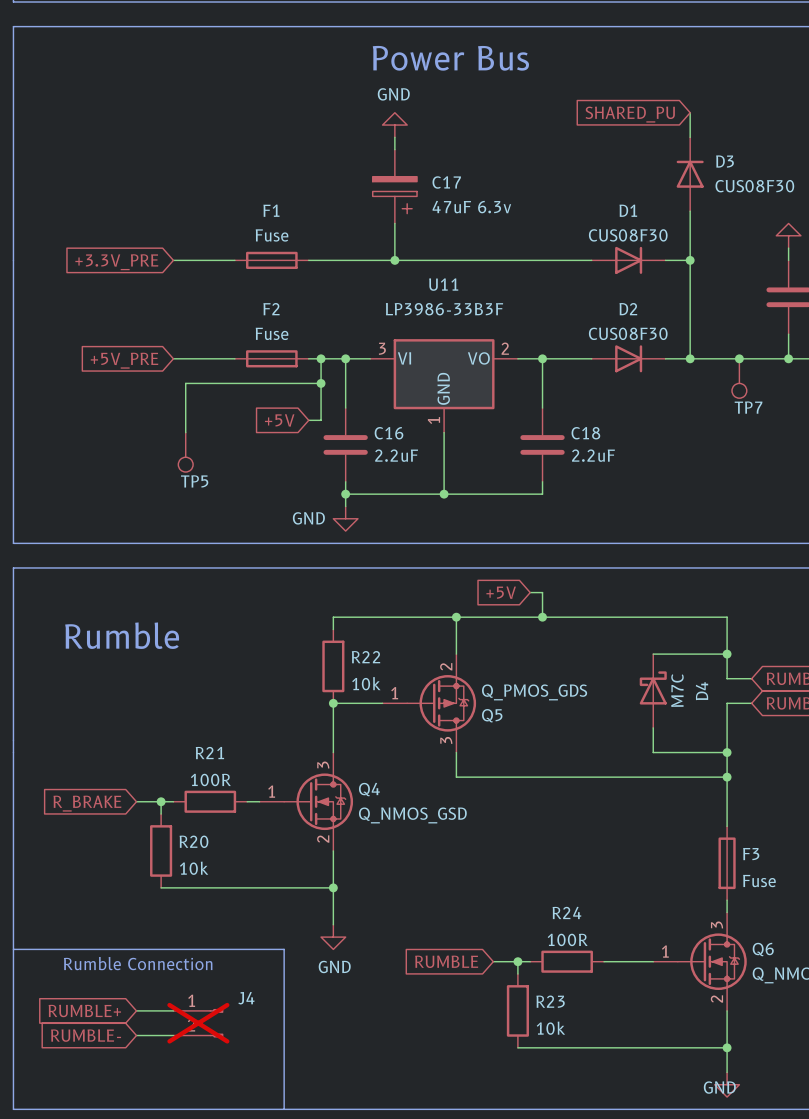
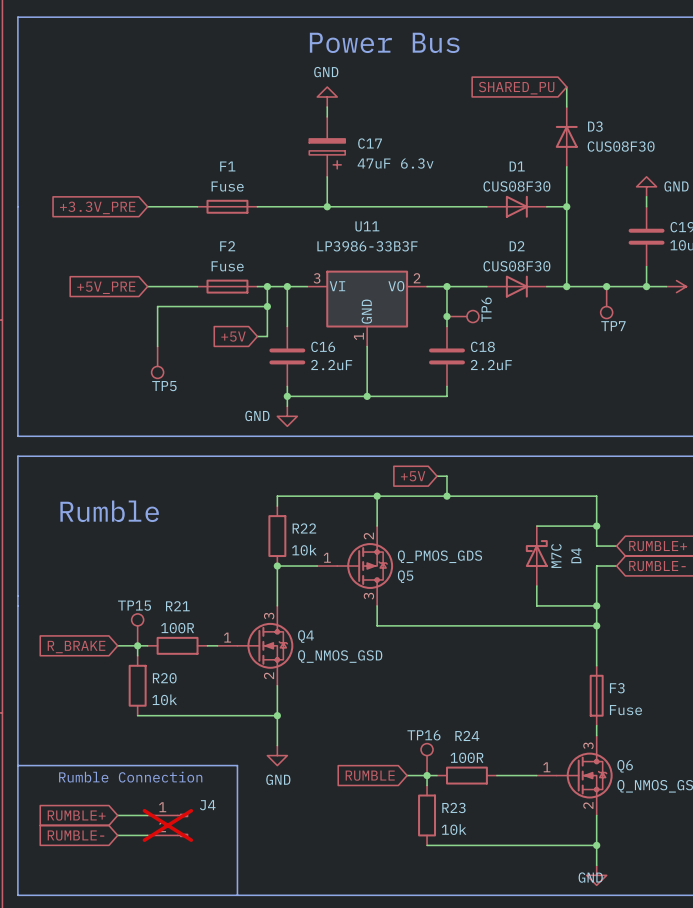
junction: none -> (446, 316)
TP6: none -> (462, 316)
TP15: none -> (137, 629)
TP16: none -> (427, 759)

